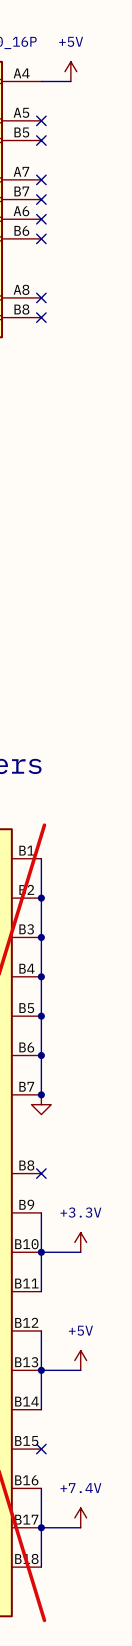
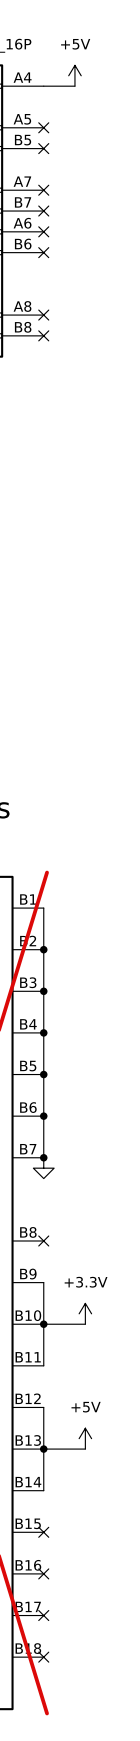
wire: (41, 1488) (41, 1567) -> none
no-connect mark: none -> (43, 1573)
power symbol: +7.4V (80, 1517) -> none
wire: (41, 1527) (80, 1527) -> none
junction: (41, 1527) -> none
no-connect mark: none -> (43, 1615)
no-connect mark: none -> (43, 1657)

